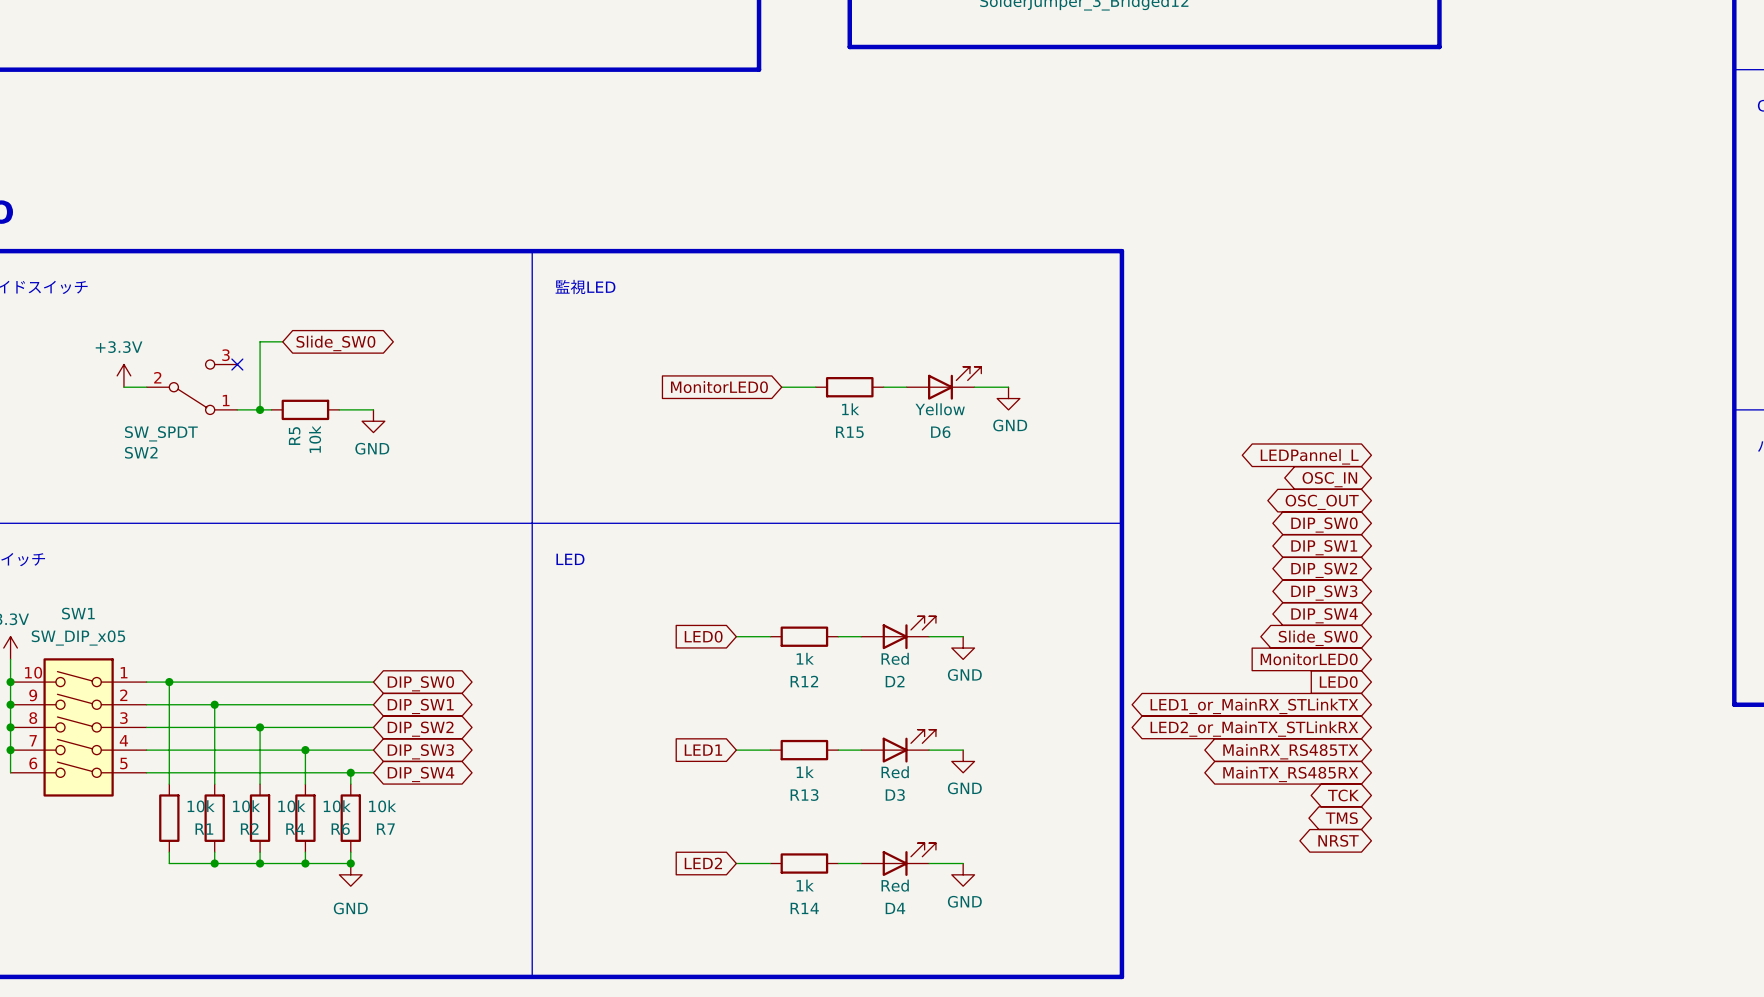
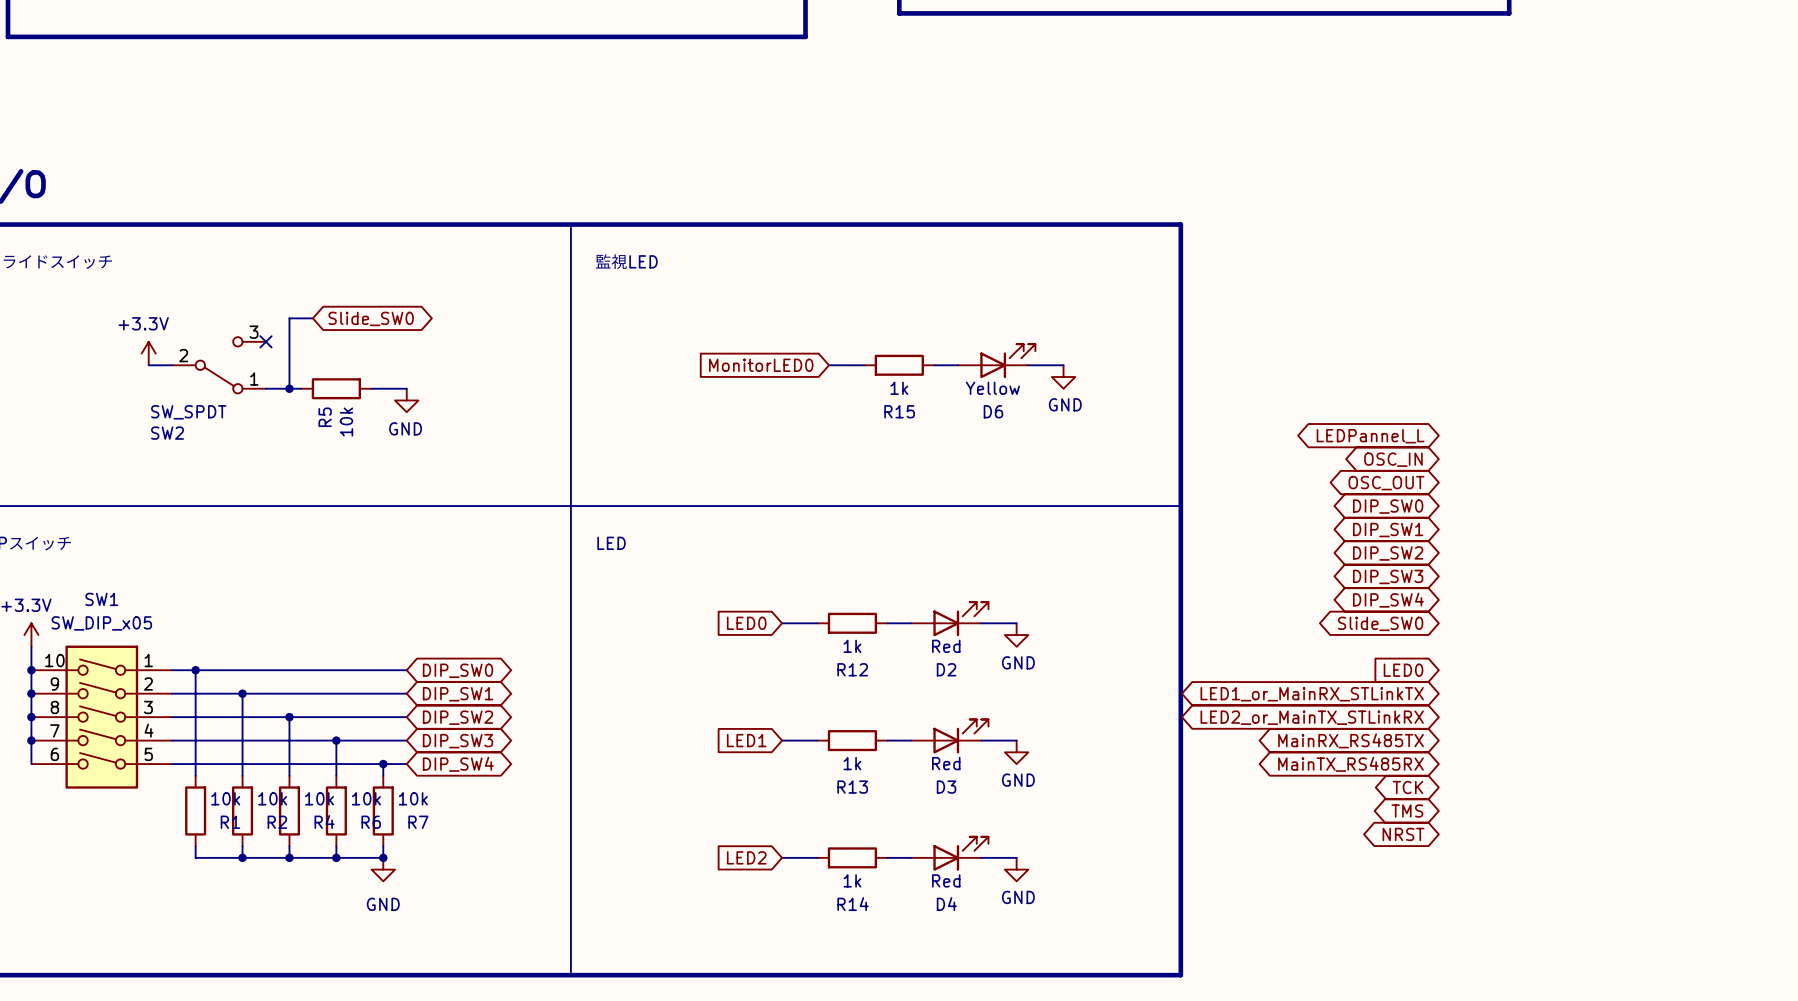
global label: MonitorLED0 (1309, 659) -> none

